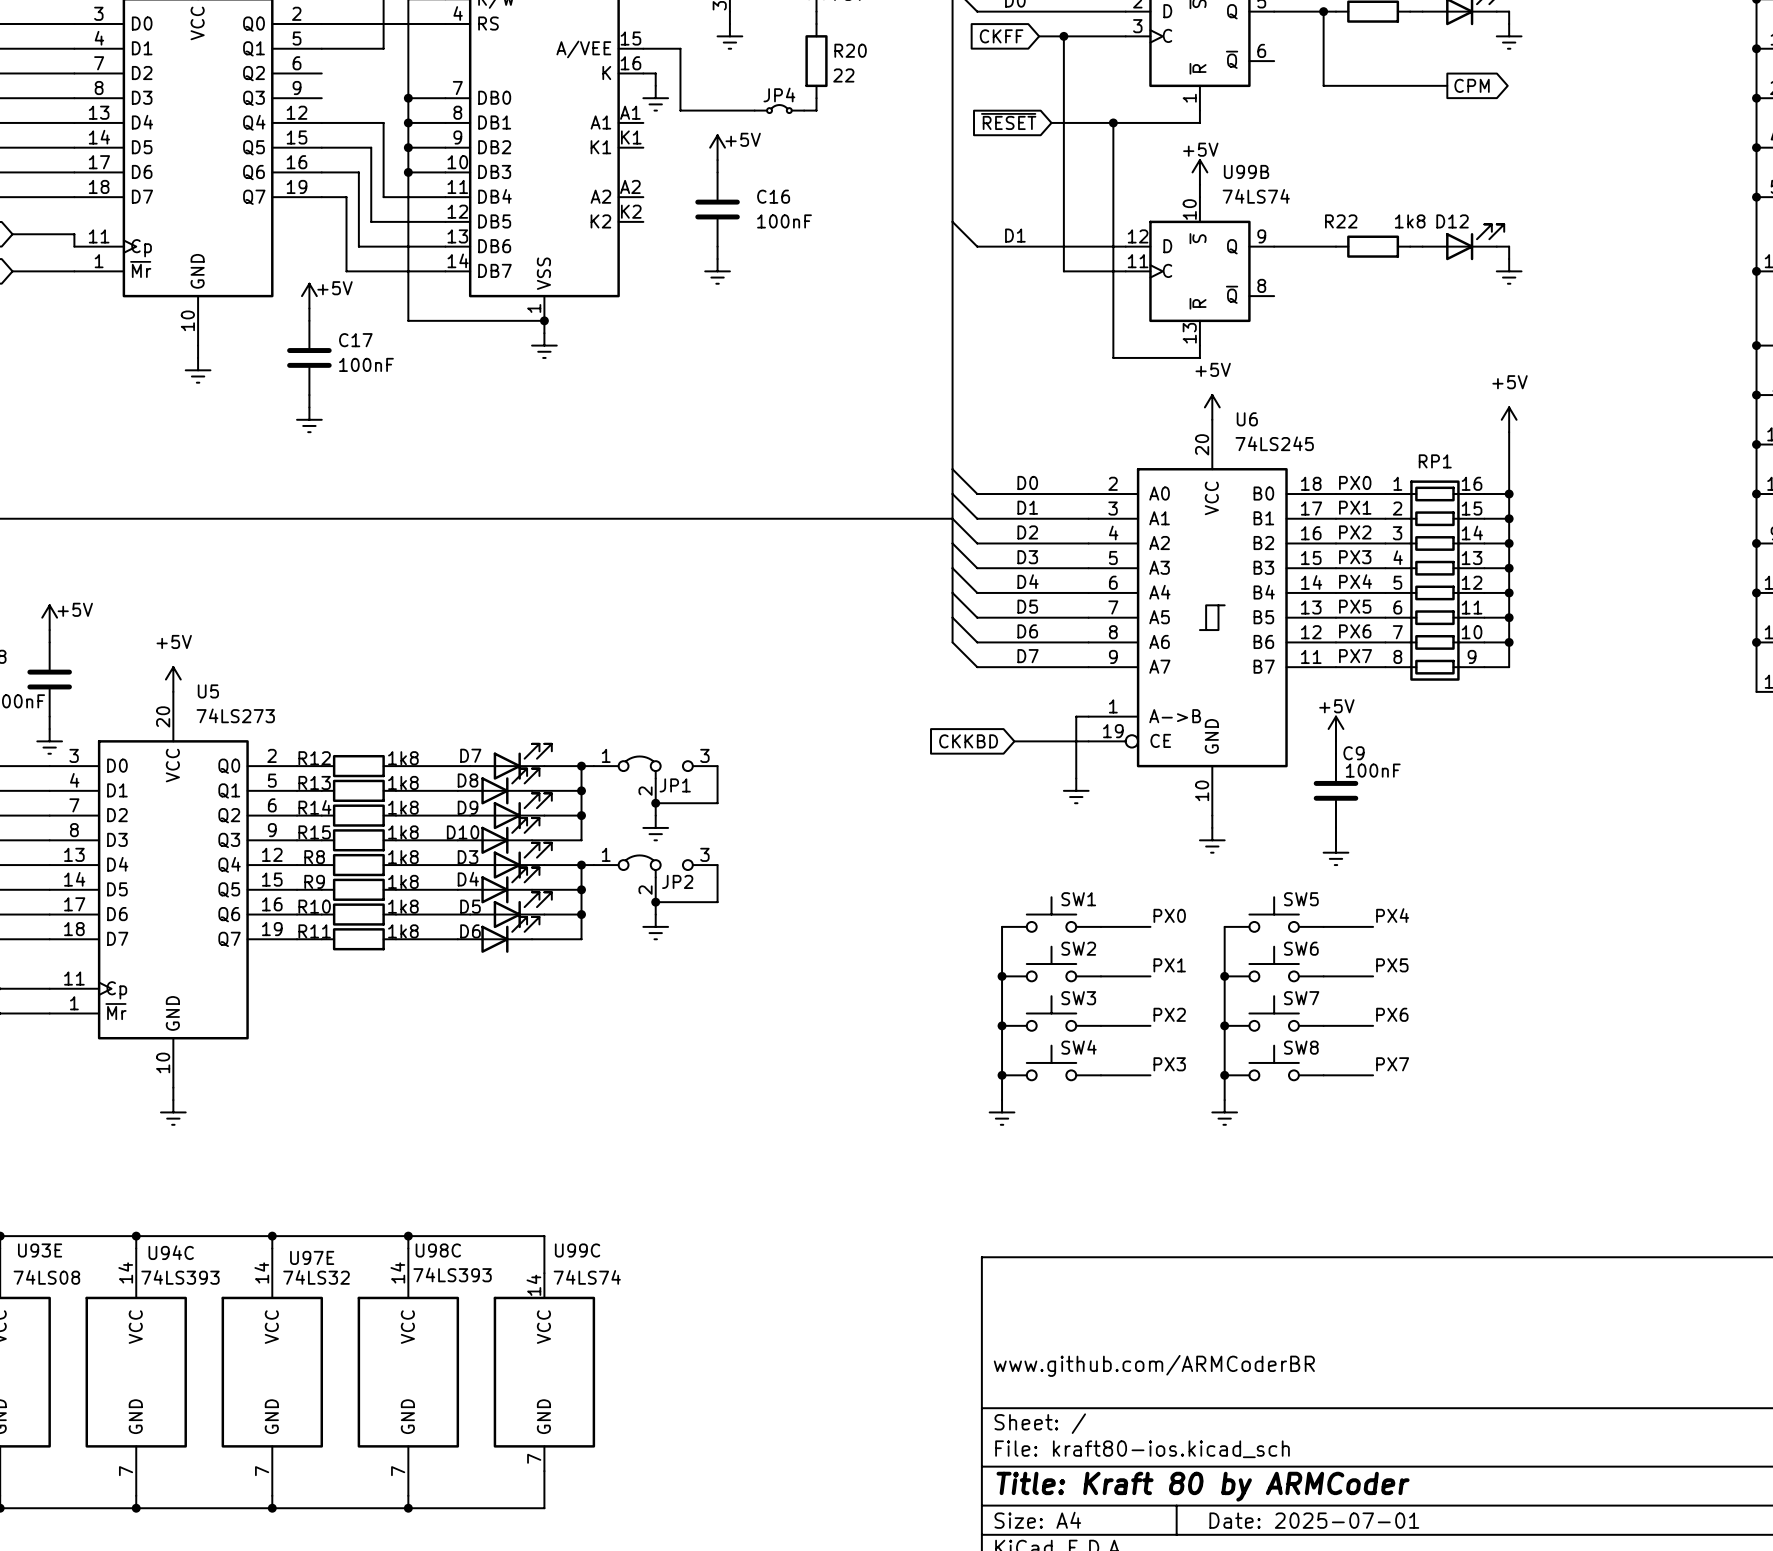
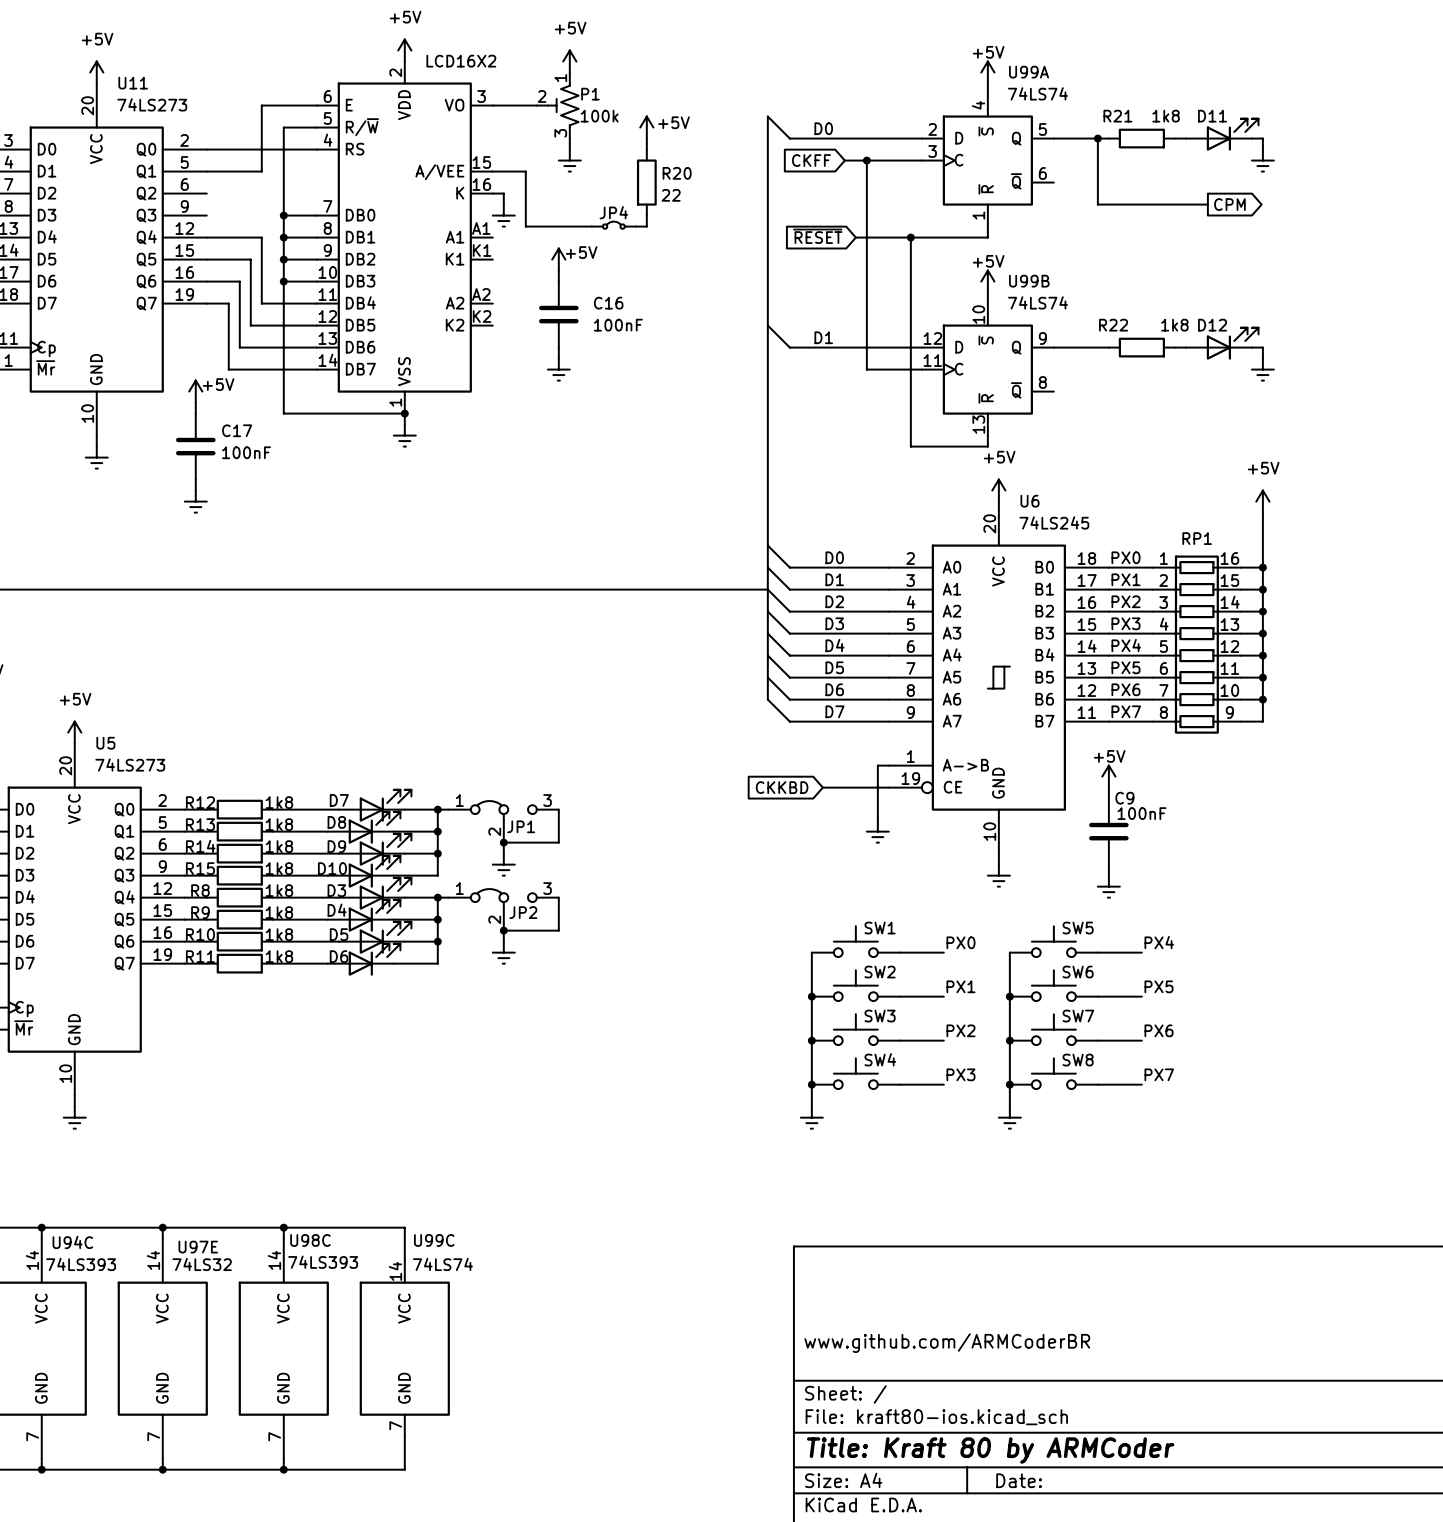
title block: Date: 2025-07-01 (1314, 1520) -> Date: (1019, 1480)

